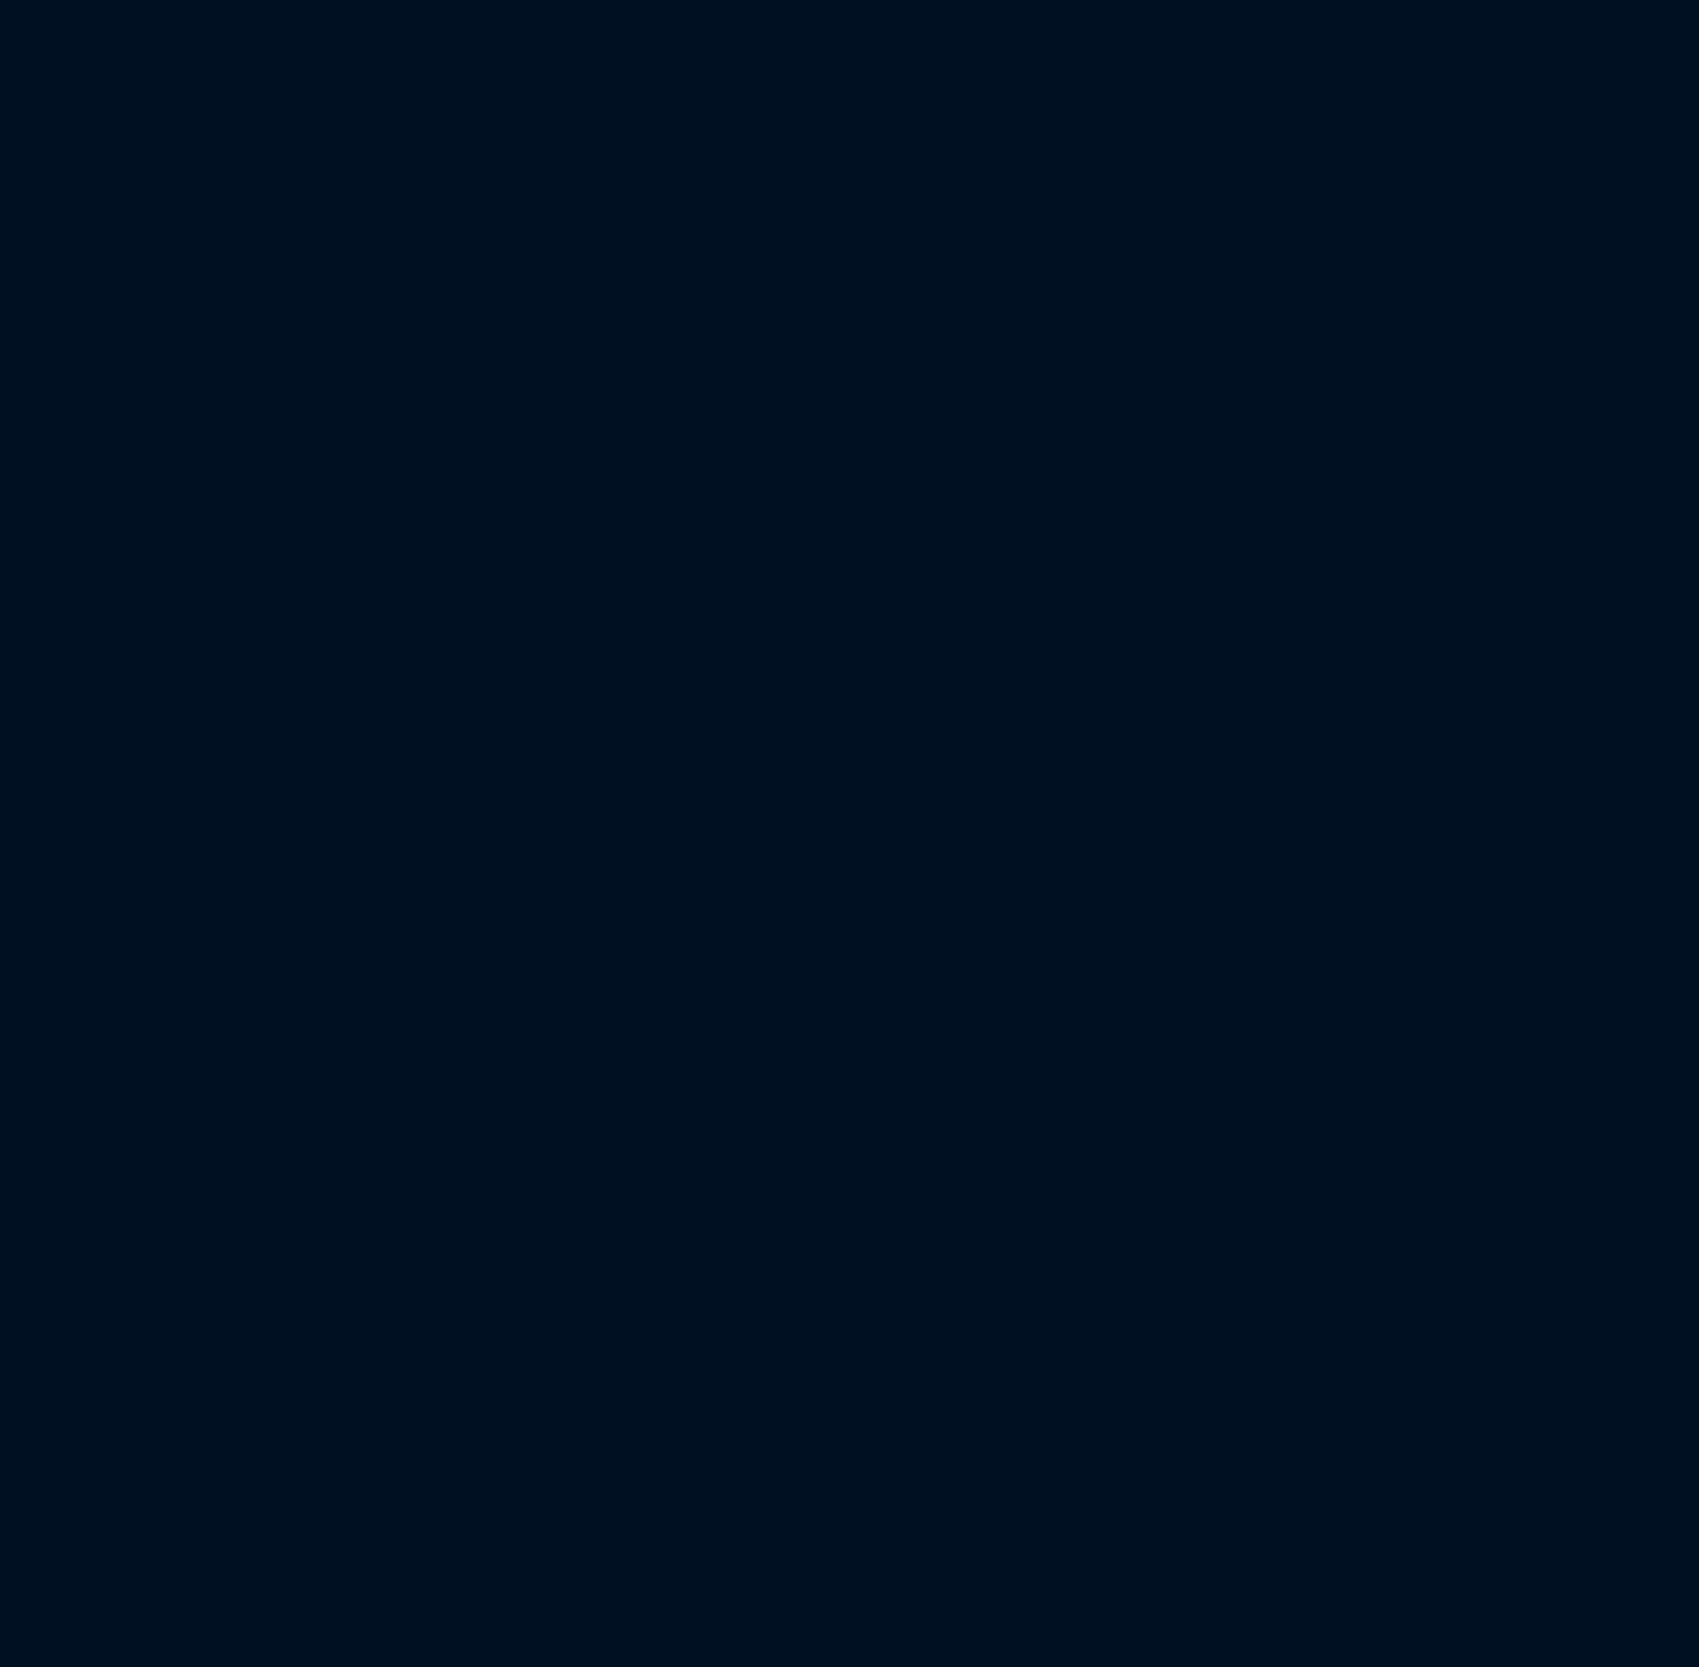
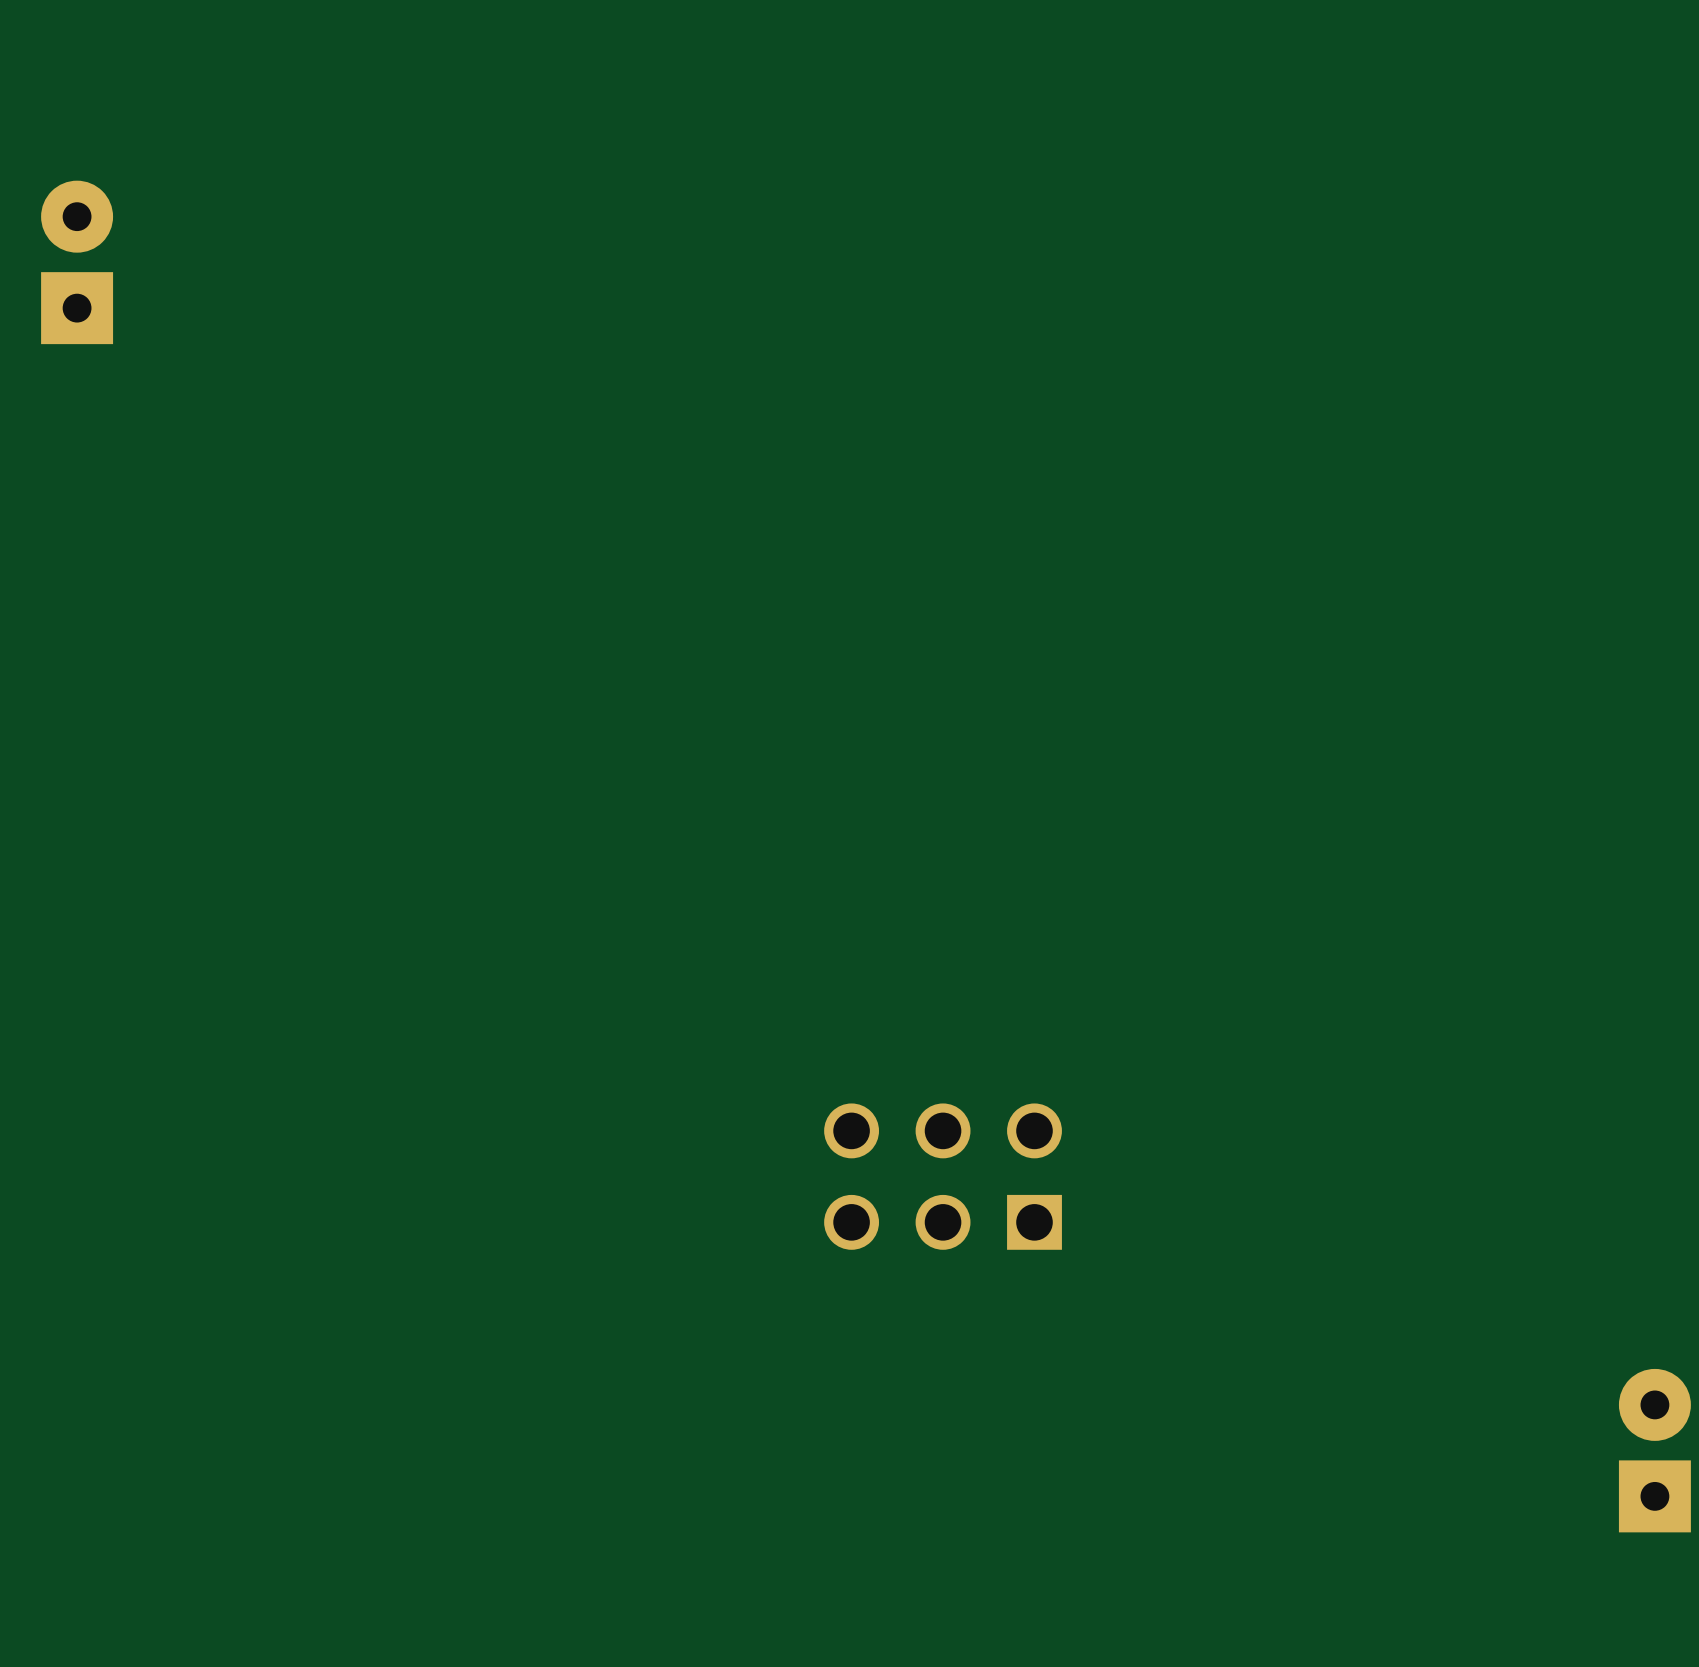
part: none -> (77, 262)
part: none -> (943, 1176)
part: none -> (1654, 1450)

